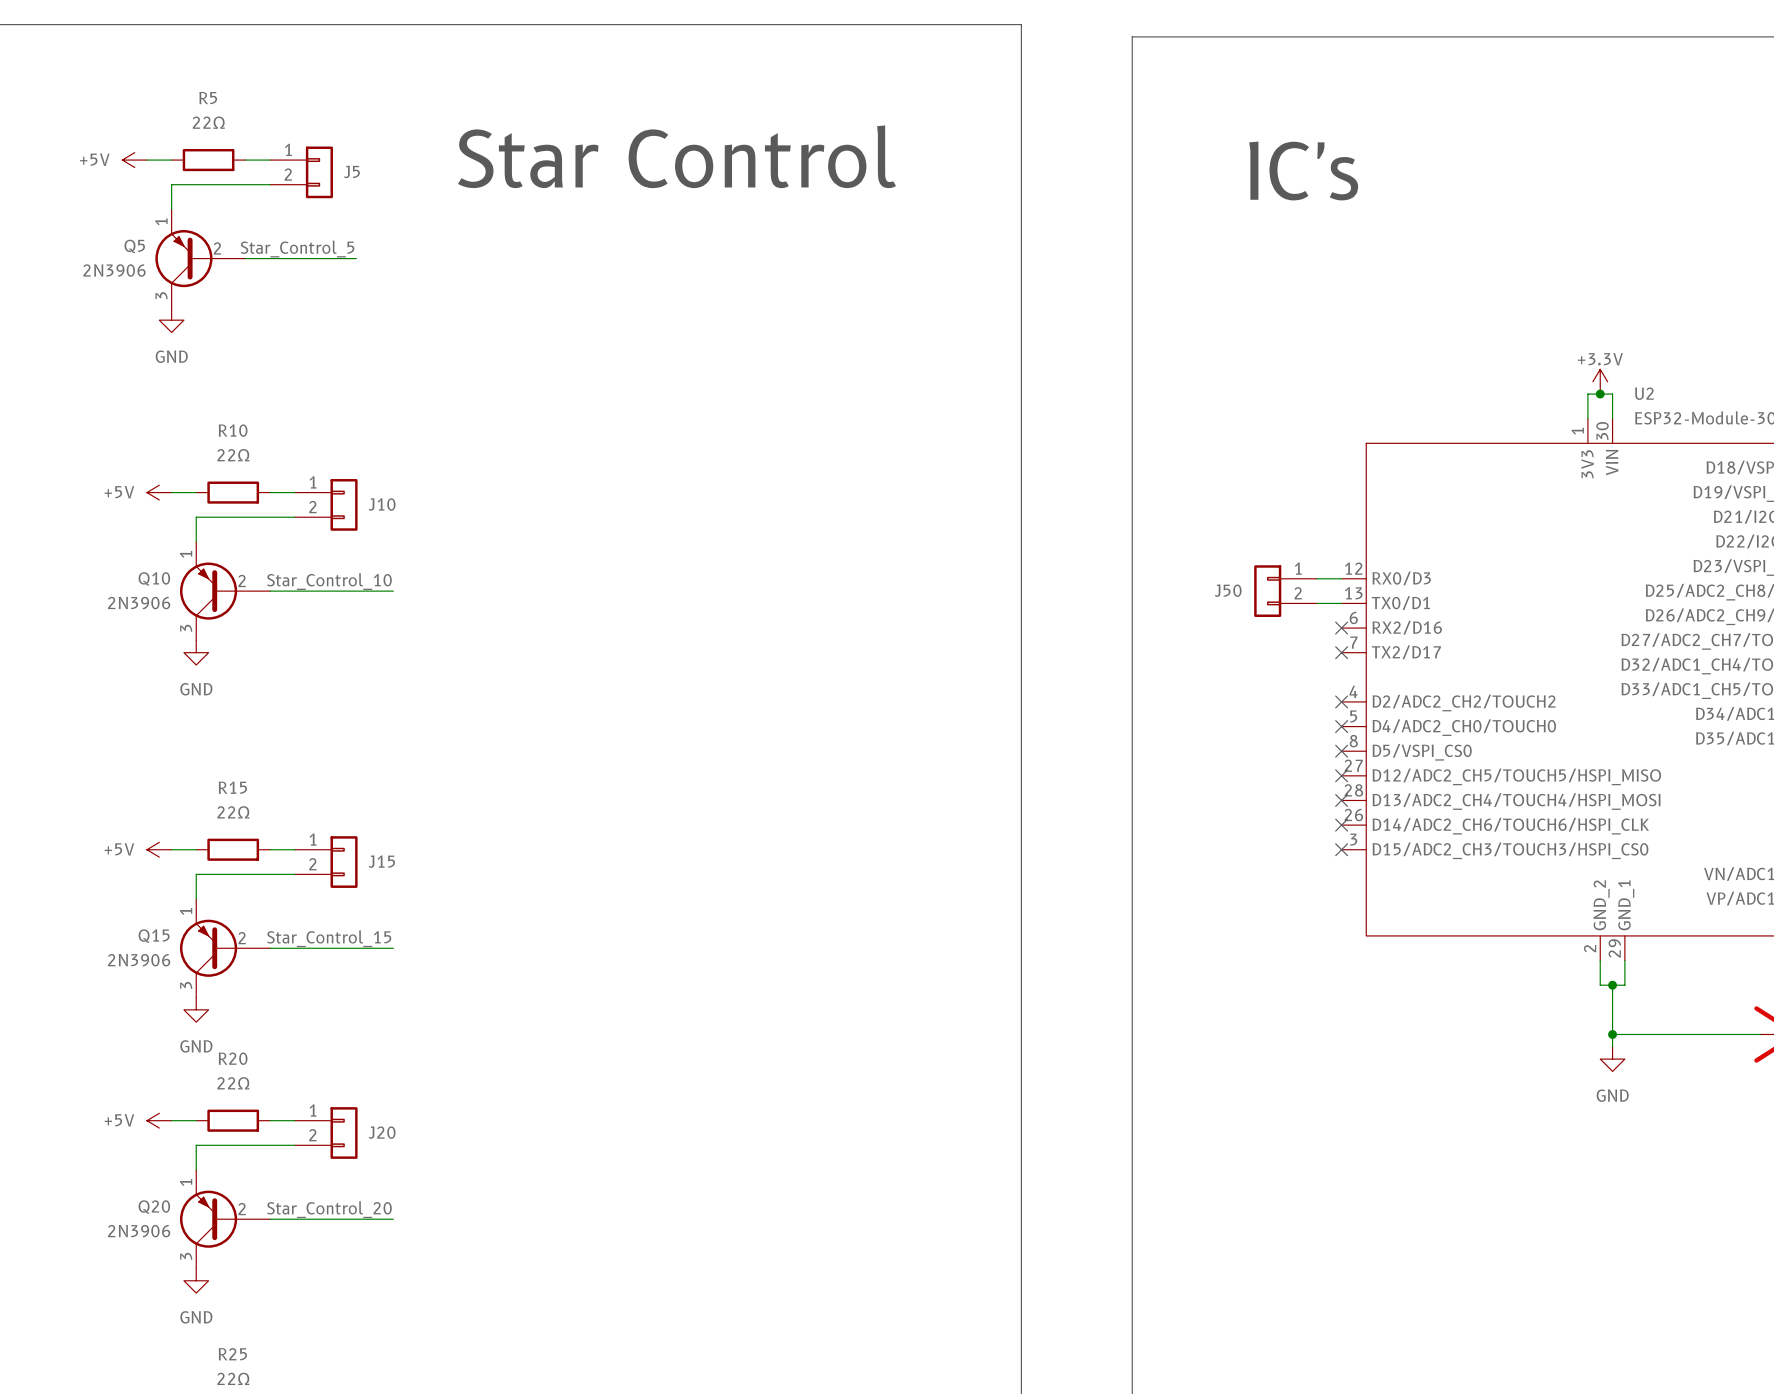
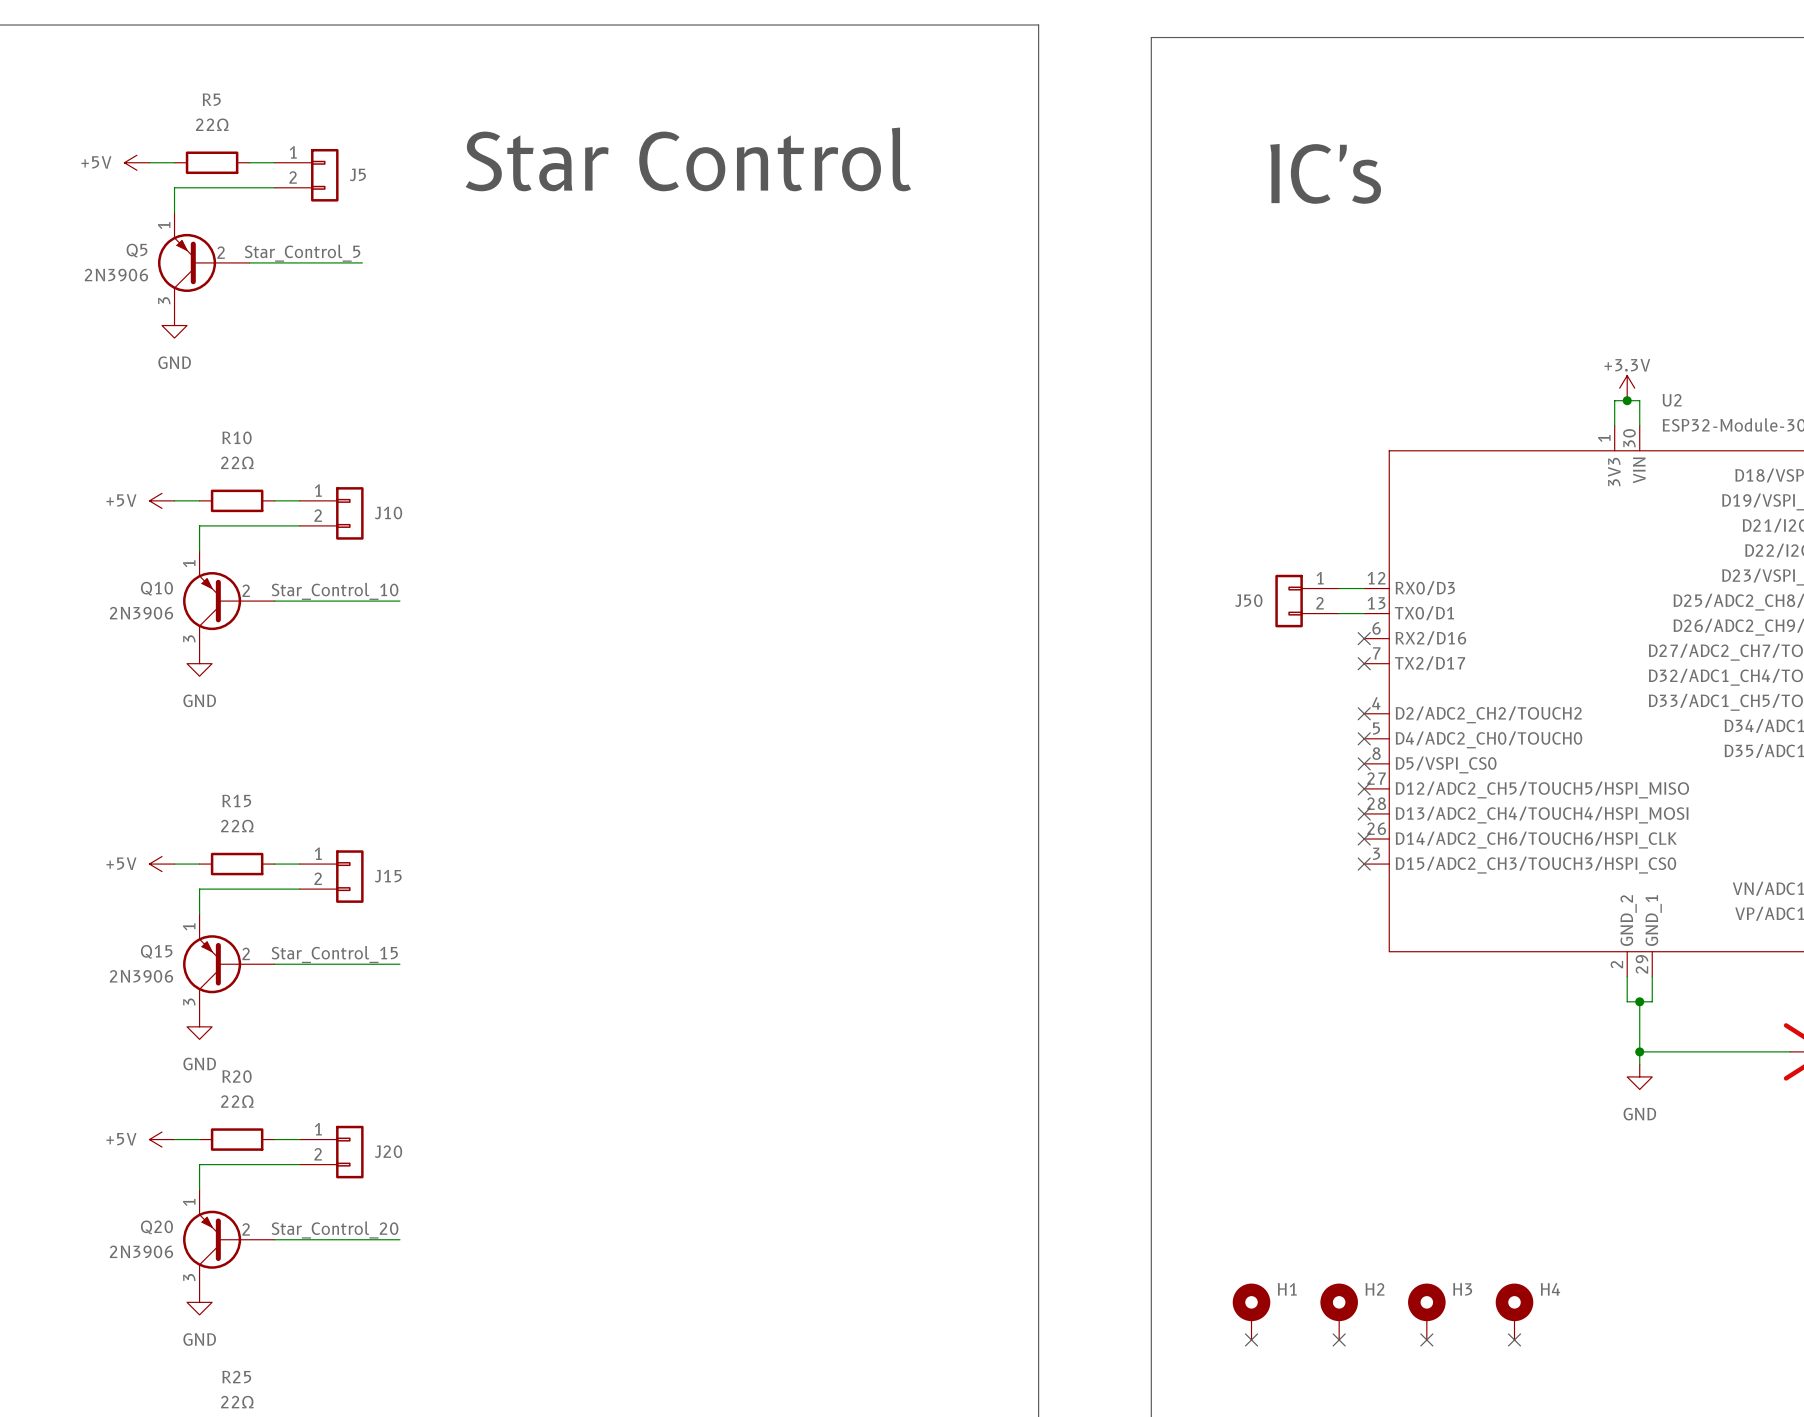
H1: none -> (1251, 1311)
H2: none -> (1339, 1311)
H3: none -> (1426, 1311)
H4: none -> (1514, 1311)
no-connect mark: none -> (1251, 1339)
no-connect mark: none -> (1339, 1339)
no-connect mark: none -> (1426, 1339)
no-connect mark: none -> (1514, 1339)

